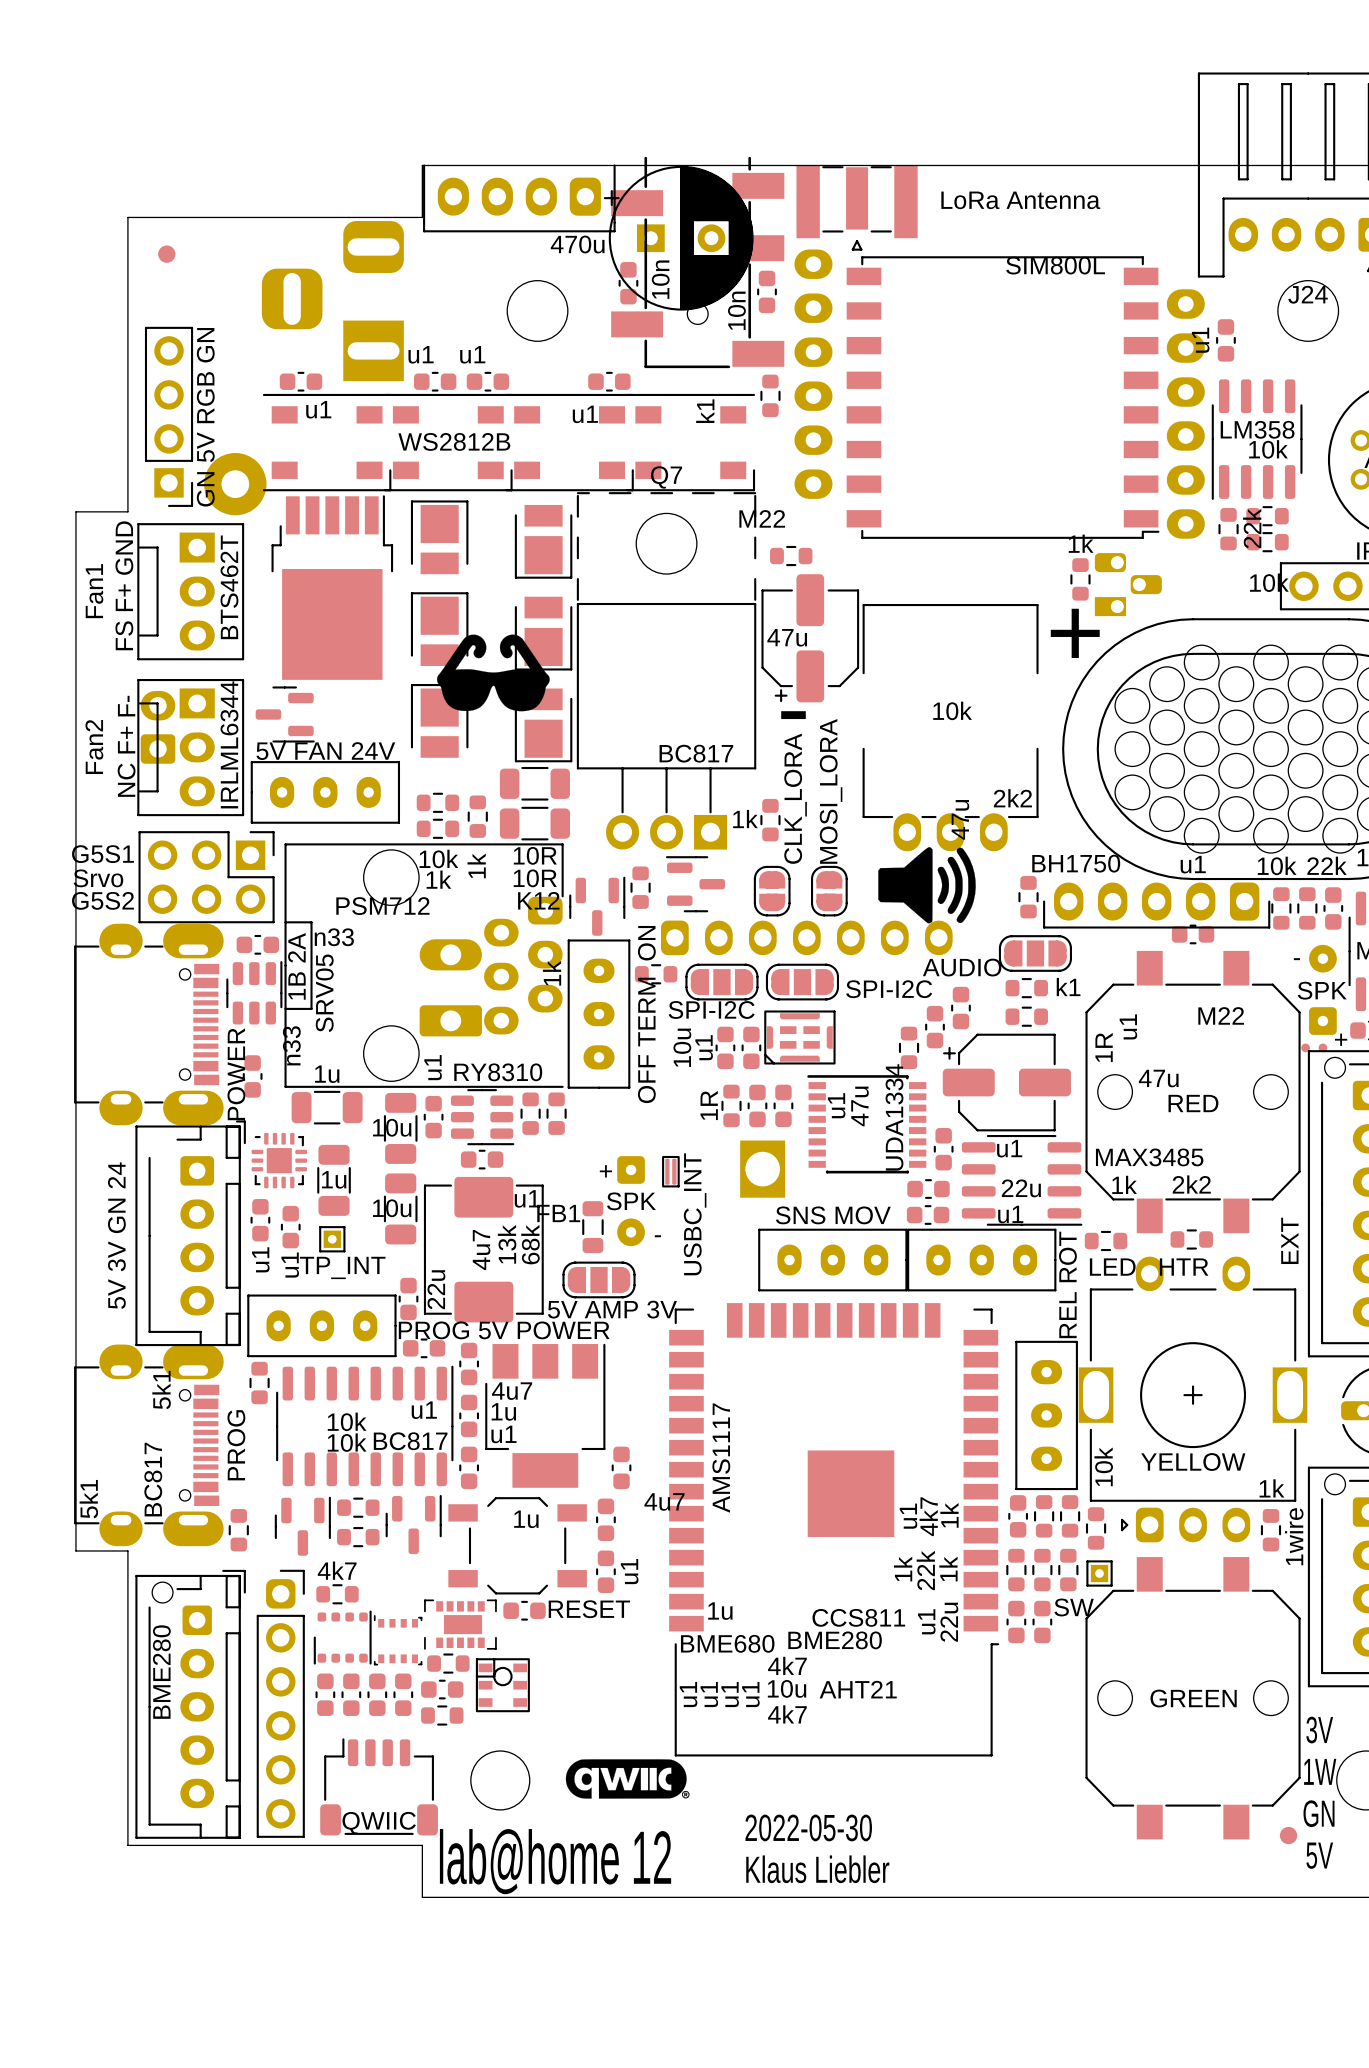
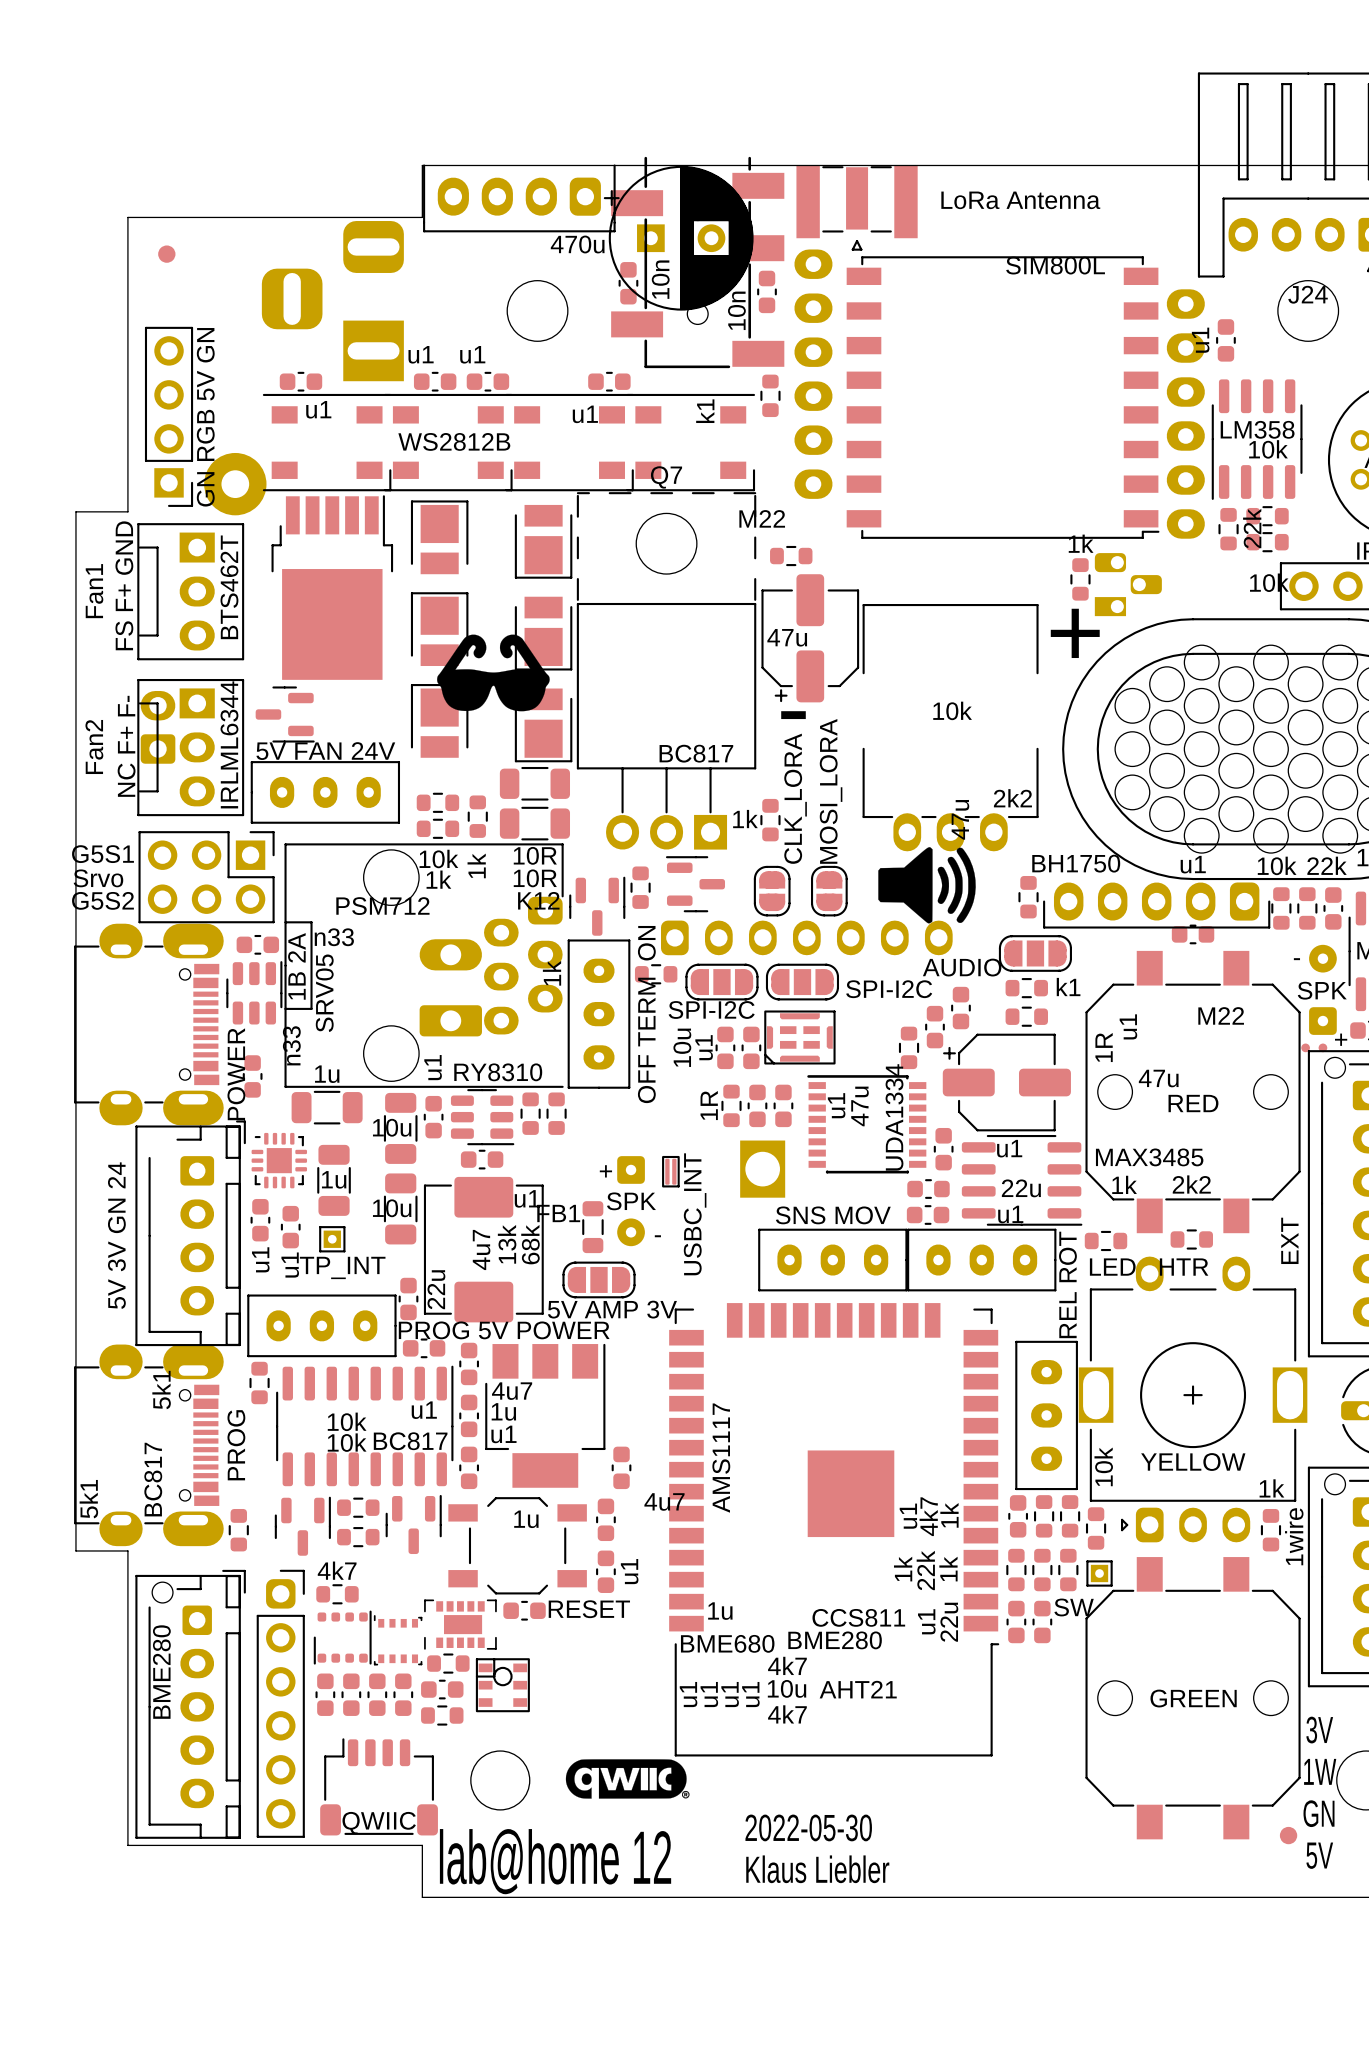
part value: GN 5V RGB GN (205, 417) -> GN RGB 5V GN (205, 417)

